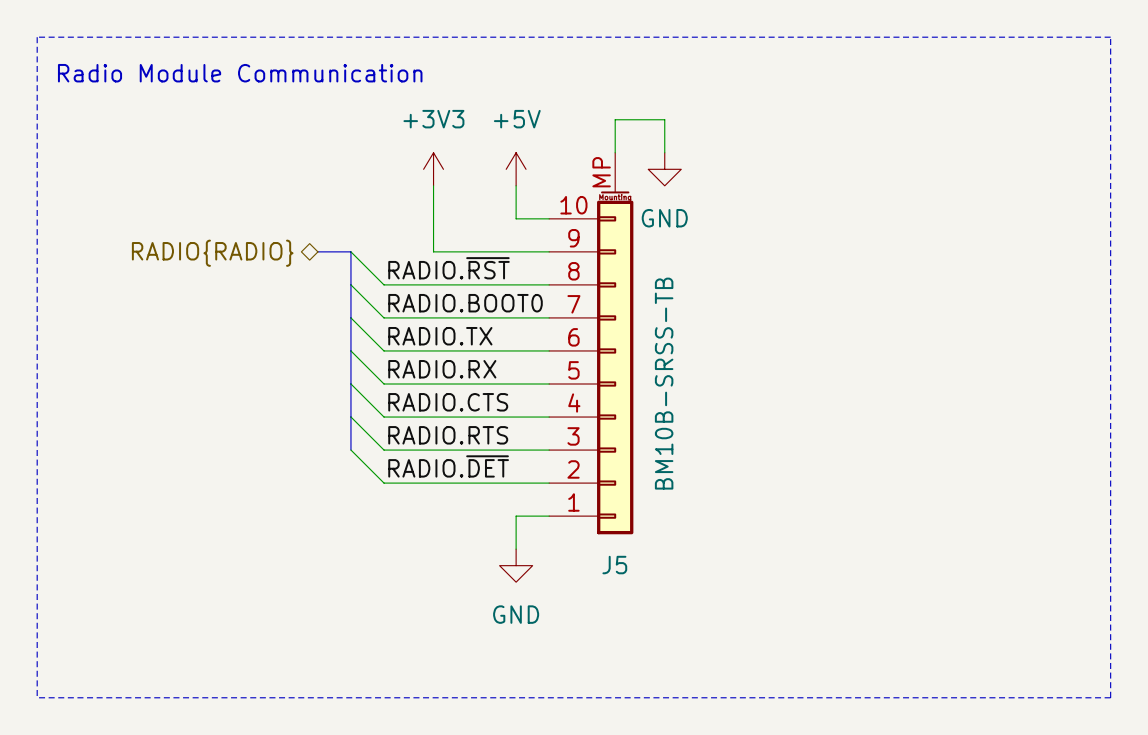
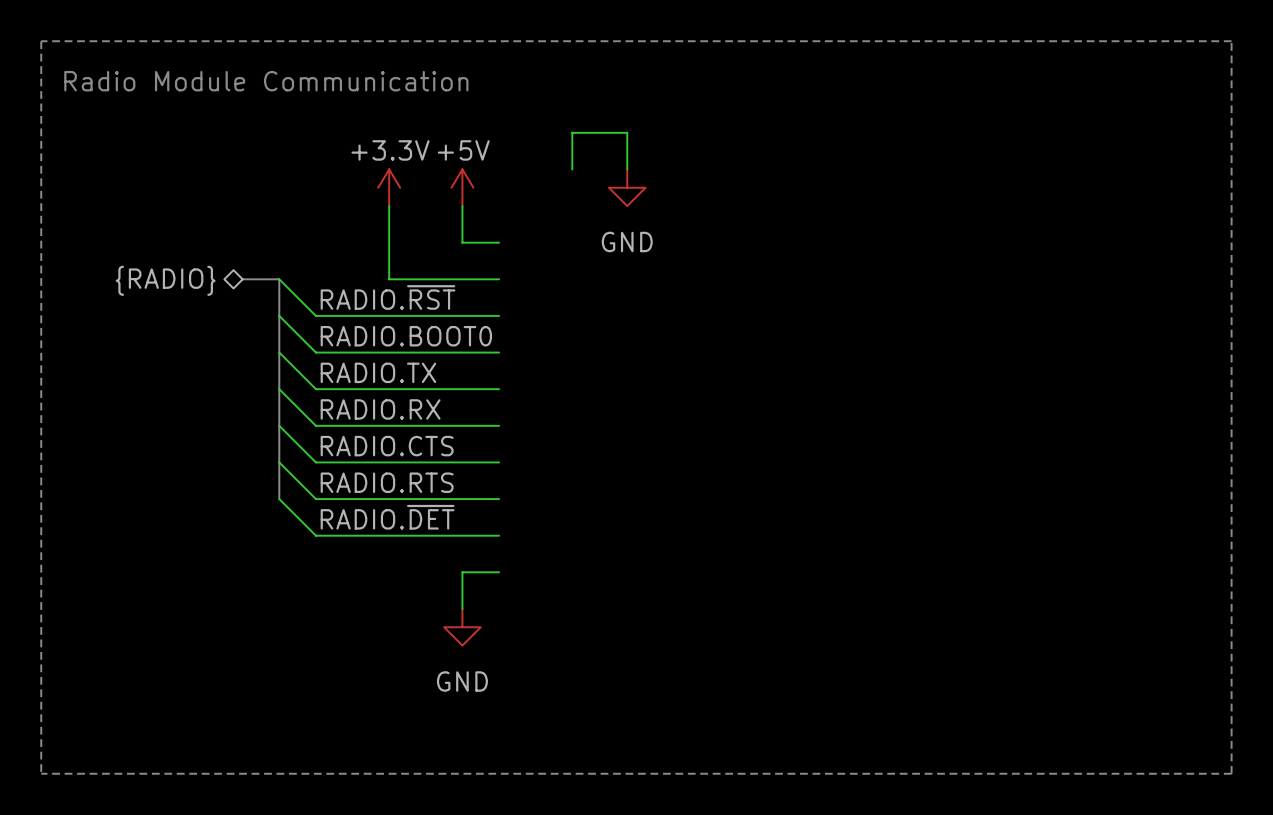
power symbol text position: +5V (517, 119) -> +5V (463, 150)
wire: (615, 152) (615, 119) (664, 119) (664, 152) -> (572, 169) (572, 132) (627, 132) (627, 169)
power symbol: none -> +3.3V (389, 187)
power symbol: +3V3 (433, 169) -> none
power symbol position: +5V (516, 169) -> +5V (462, 187)
power symbol position: GND (664, 169) -> GND (627, 187)
wire: (433, 185) (433, 251) -> (389, 206) (389, 279) (480, 279)
wire: (516, 185) (516, 218) (549, 218) -> (462, 206) (462, 242) (499, 242)
bus: (317, 251) (350, 251) (350, 450) -> (242, 279) (279, 279) (279, 499)
wire: (350, 251) (384, 284) -> (279, 279) (315, 315) (425, 315)
wire: (450, 251) (549, 251) -> none
hierarchical label: RADIO{RADIO} (212, 253) -> {RADIO} (165, 280)
label position: RADIO.~{RST} (449, 268) -> RADIO.~{RST} (388, 297)
wire: (350, 284) (384, 317) -> (279, 315) (315, 352) (425, 352)
wire: (450, 284) (549, 284) -> none
label position: RADIO.BOOT0 (465, 303) -> RADIO.BOOT0 (406, 336)
wire: (350, 317) (384, 350) -> (279, 352) (315, 389) (425, 389)
wire: (450, 317) (549, 317) -> none
label position: RADIO.TX (440, 336) -> RADIO.TX (378, 372)
J5: BM10B-SRSS-TB (591, 343) -> none
wire: (350, 350) (384, 384) -> (279, 389) (315, 425) (425, 425)
wire: (450, 350) (549, 350) -> none
label position: RADIO.RX (442, 369) -> RADIO.RX (380, 409)
wire: (350, 384) (384, 417) -> (279, 425) (315, 462) (425, 462)
wire: (450, 384) (549, 384) -> none
label position: RADIO.CTS (448, 402) -> RADIO.CTS (387, 446)
wire: (350, 417) (384, 450) -> (279, 462) (315, 499) (425, 499)
wire: (450, 417) (549, 417) -> none
label position: RADIO.RTS (448, 435) -> RADIO.RTS (387, 482)
wire: (350, 450) (384, 483) -> (279, 499) (315, 535) (425, 535)
wire: (450, 450) (549, 450) -> none
label position: RADIO.~{DET} (448, 466) -> RADIO.~{DET} (387, 517)
wire: (450, 483) (549, 483) -> none
wire: (549, 516) (516, 516) (516, 549) -> (499, 572) (462, 572) (462, 608)
power symbol position: GND (516, 565) -> GND (462, 627)

